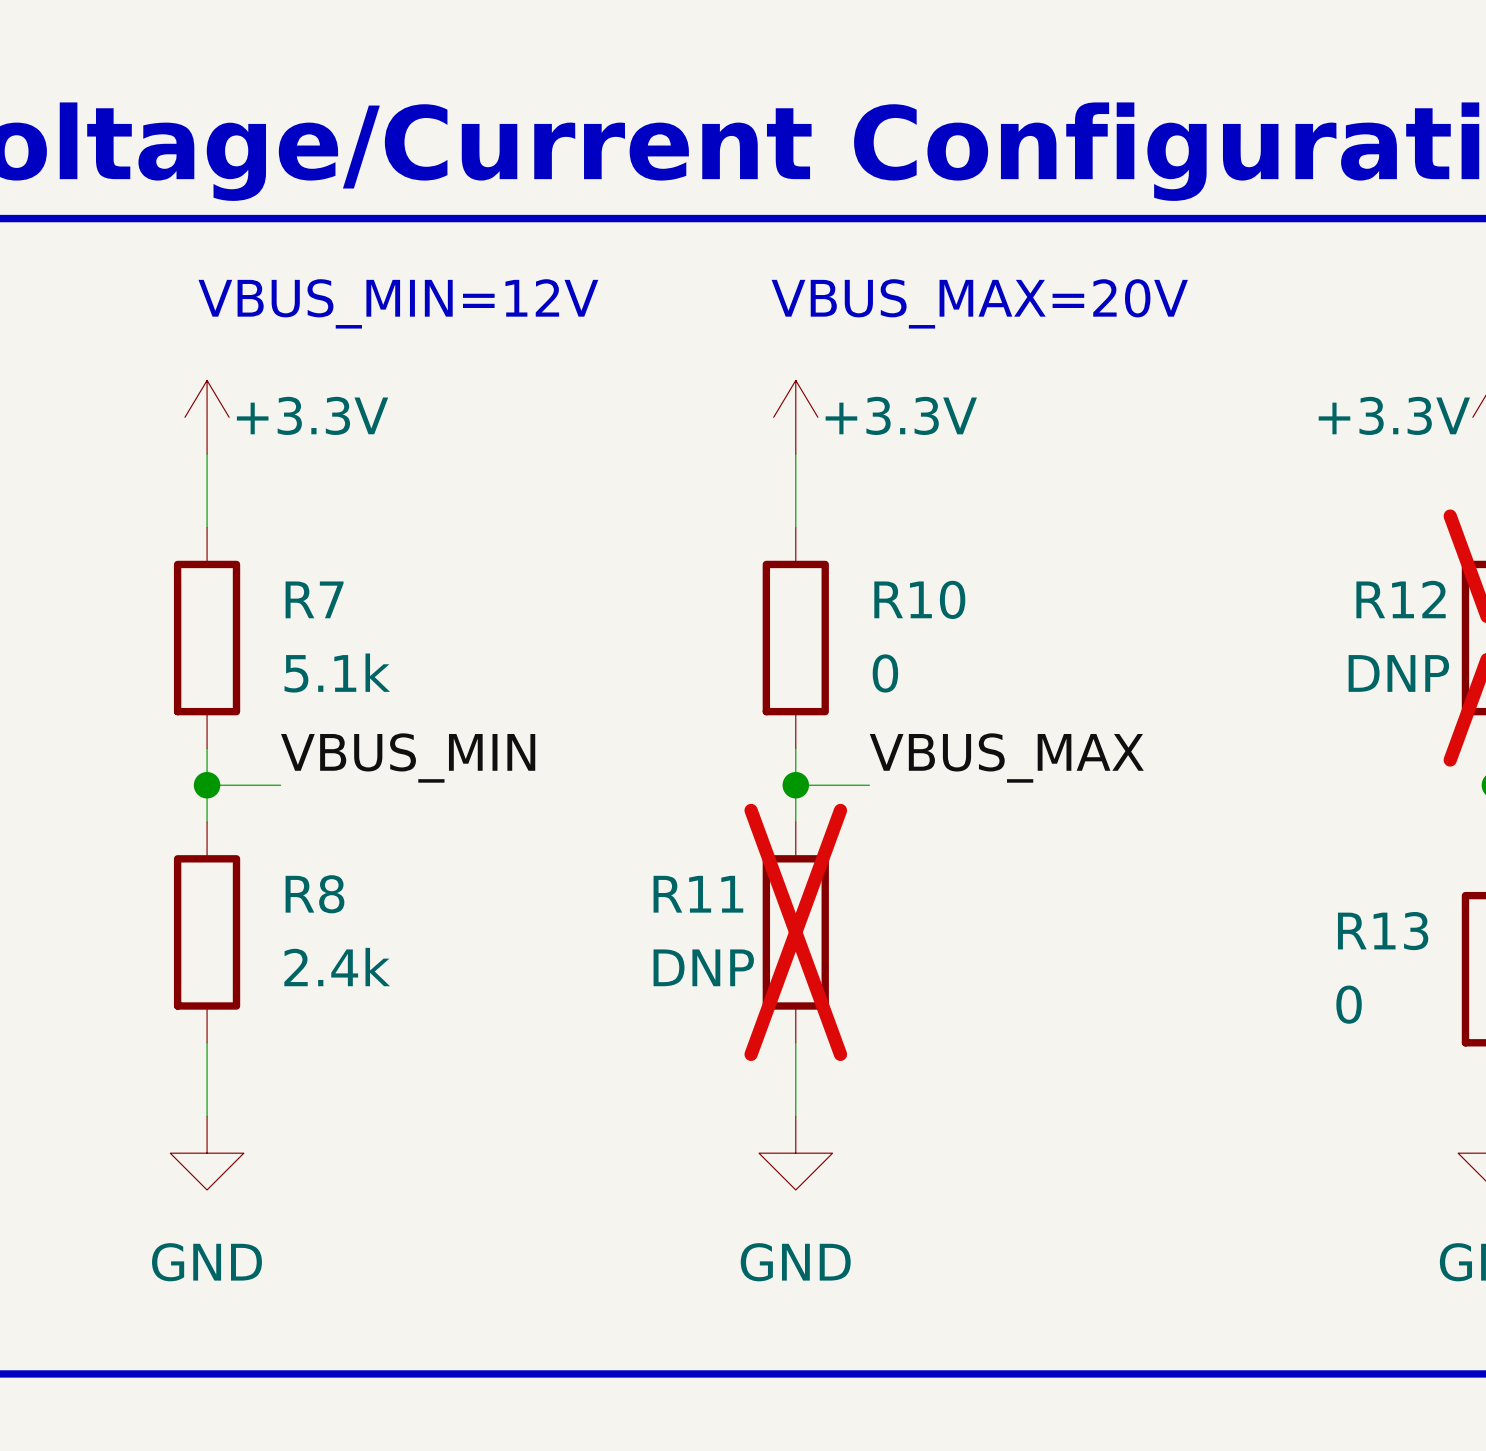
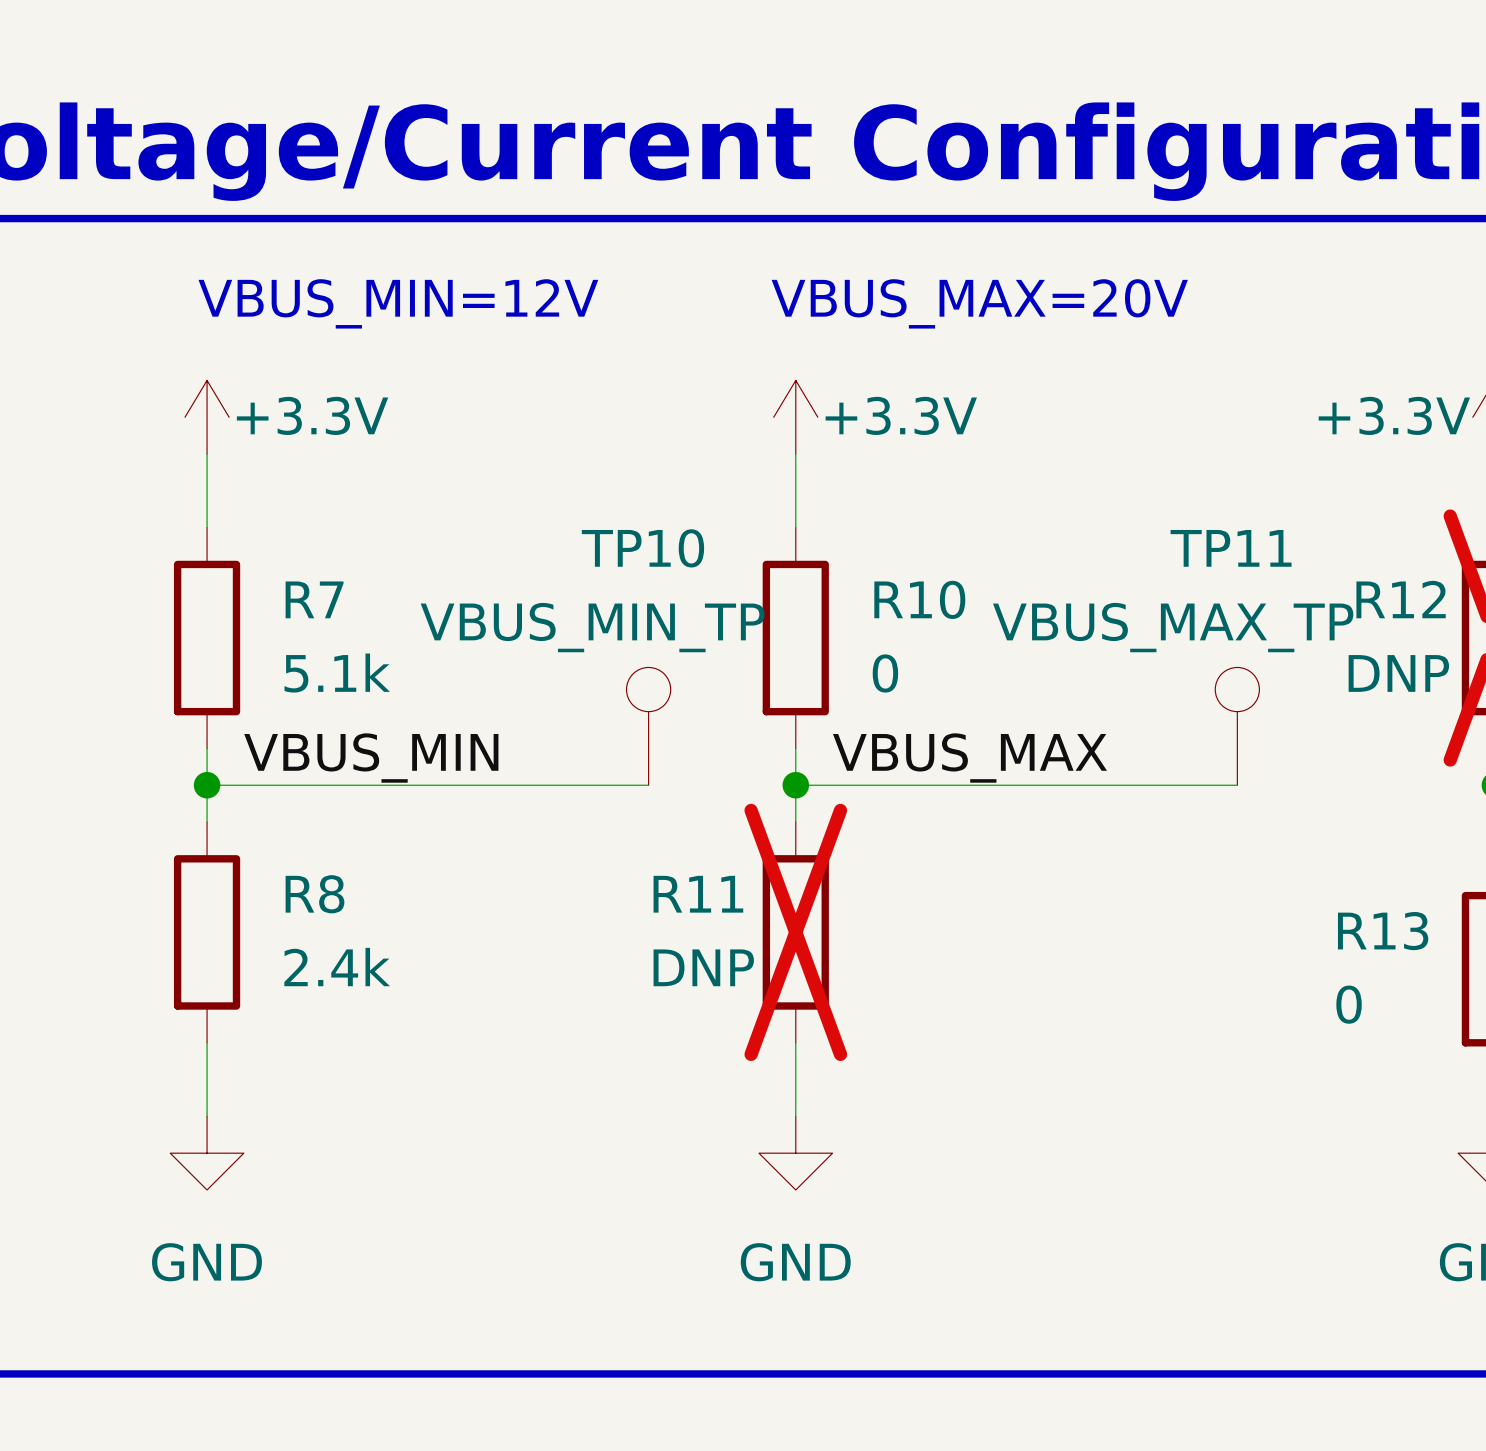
TP10: none -> VBUS_MIN_TP (648, 726)
TP11: none -> VBUS_MAX_TP (1237, 726)
label position: VBUS_MIN (408, 758) -> VBUS_MIN (371, 758)
label position: VBUS_MAX (1006, 758) -> VBUS_MAX (969, 758)
wire: none -> (280, 785) (648, 785)
wire: none -> (869, 785) (1237, 785)

